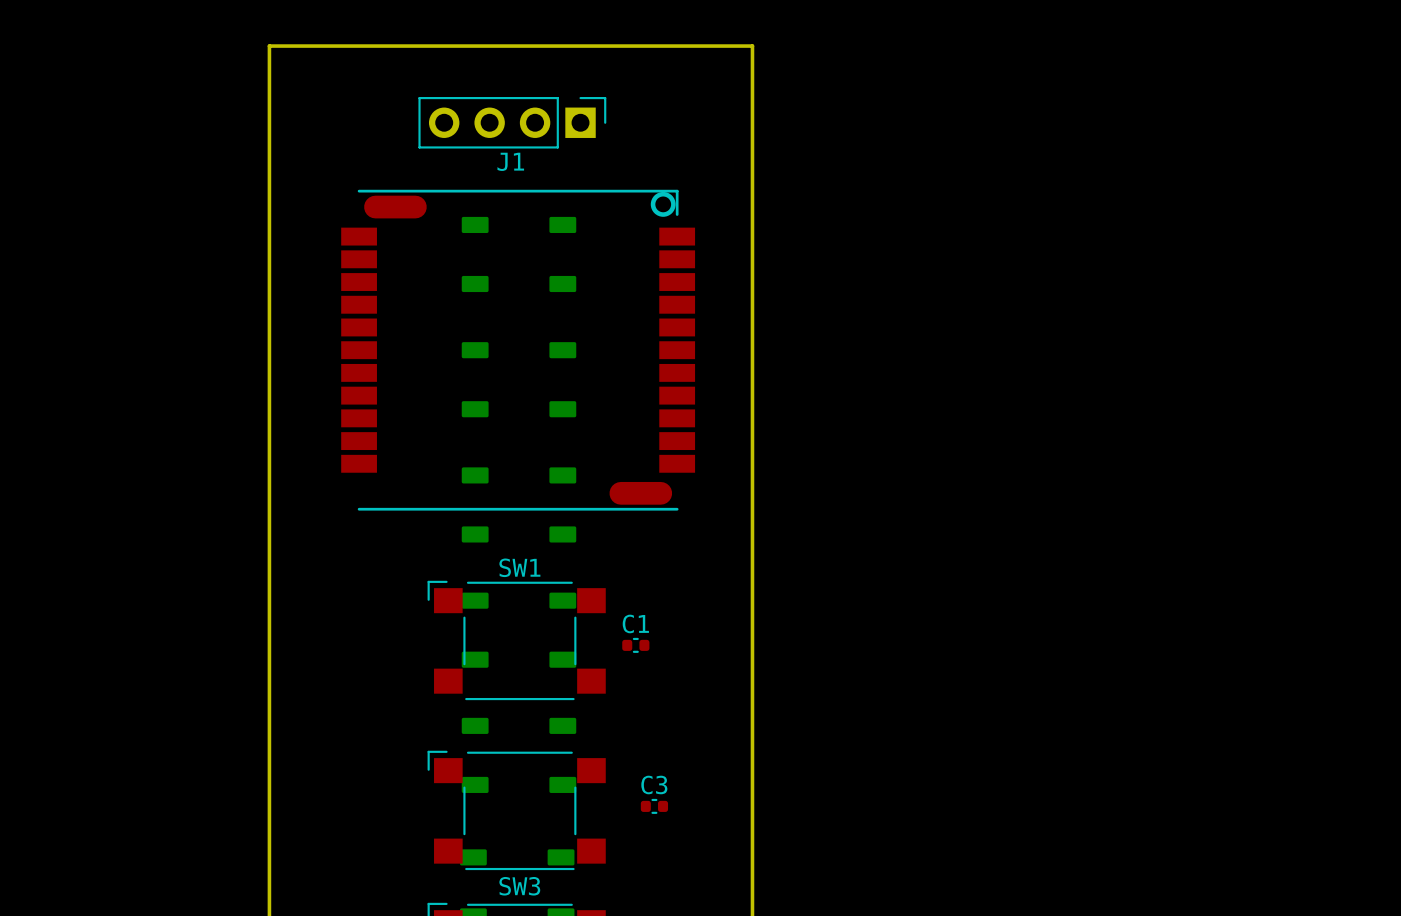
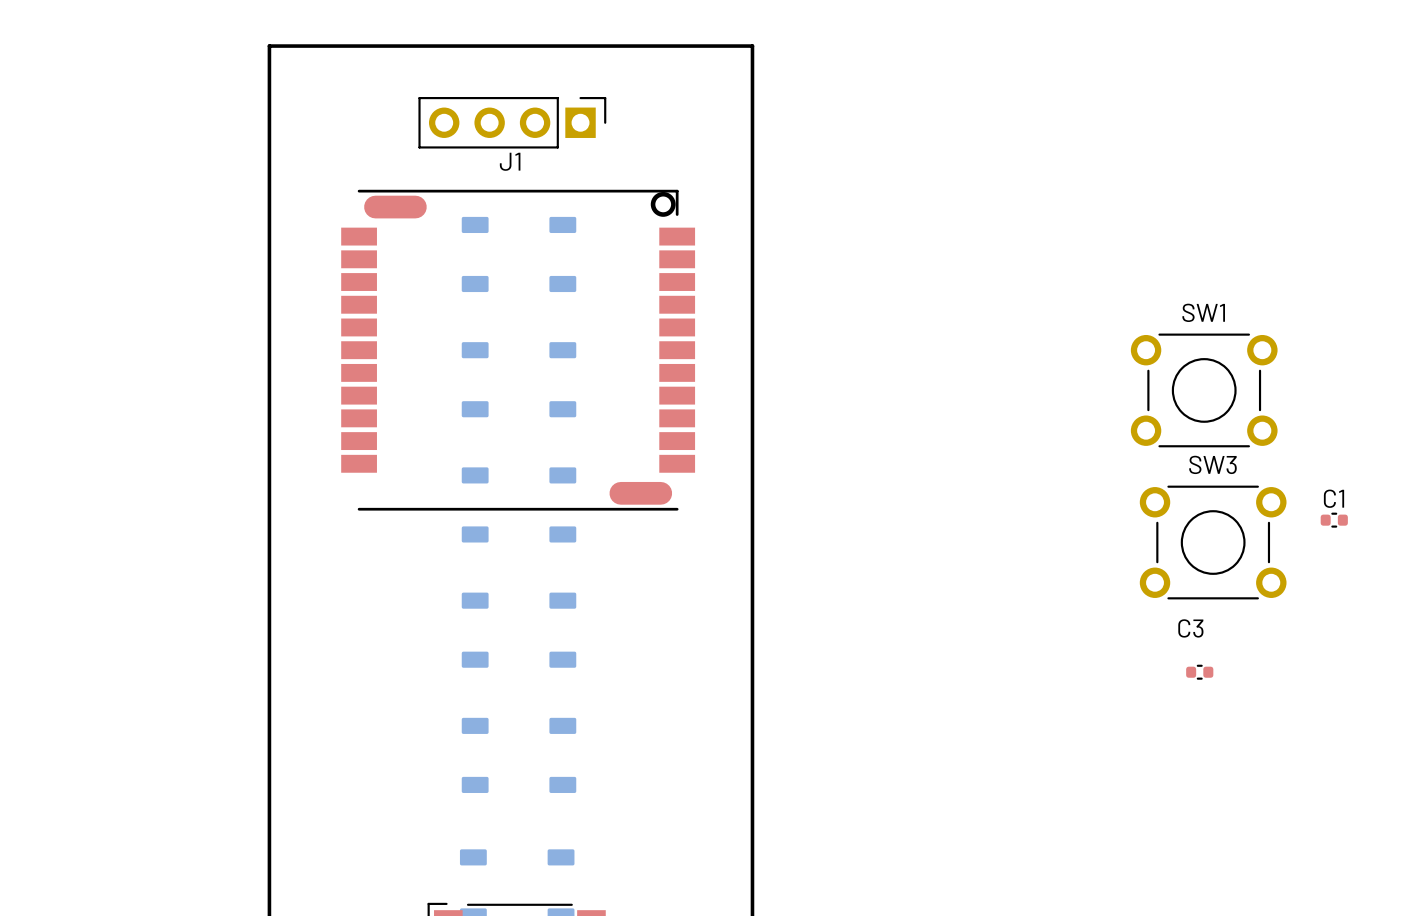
SW1 footprint: [427, 580, 606, 701] -> [1130, 333, 1278, 448]
C1 position: (635, 645) -> (1334, 520)
SW3 footprint: [427, 750, 606, 871] -> [1139, 485, 1287, 600]
C3 name position: C3 (654, 784) -> C3 (1190, 628)
C3 position: (654, 806) -> (1199, 672)
SW3 name position: SW3 (519, 886) -> SW3 (1212, 464)

